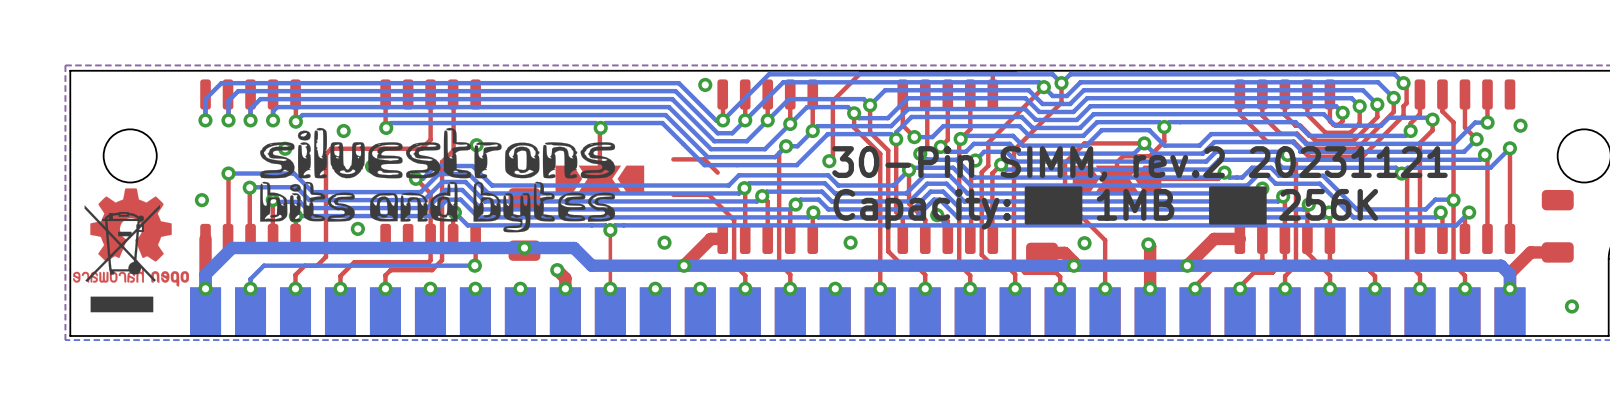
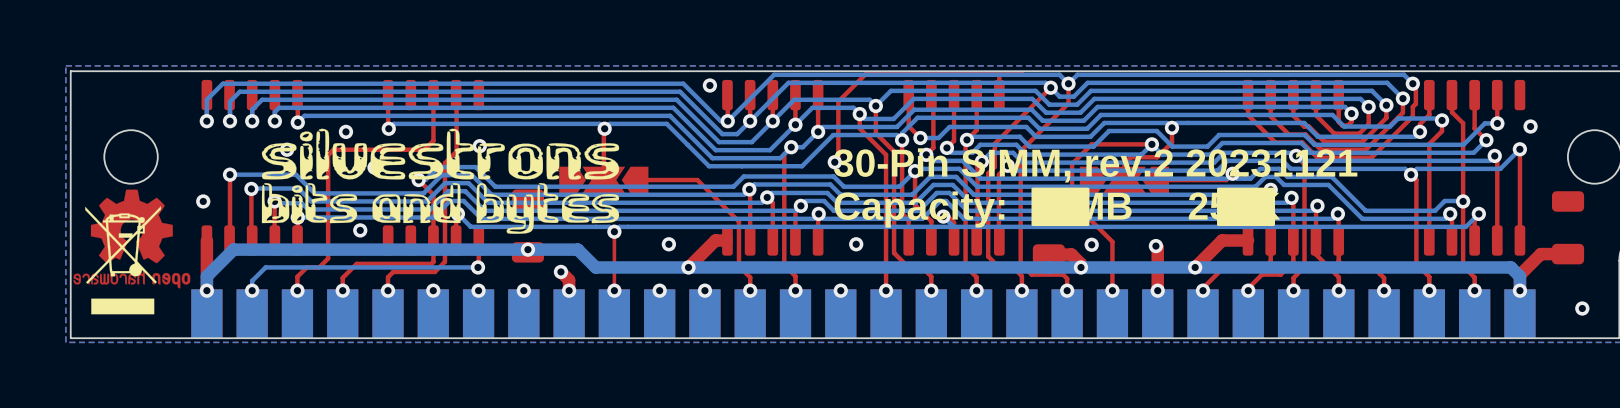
top track: (673, 159) (704, 159) (717, 172) -> none
top track: (708, 194) (673, 194) -> (713, 196) (697, 180) (639, 180)

